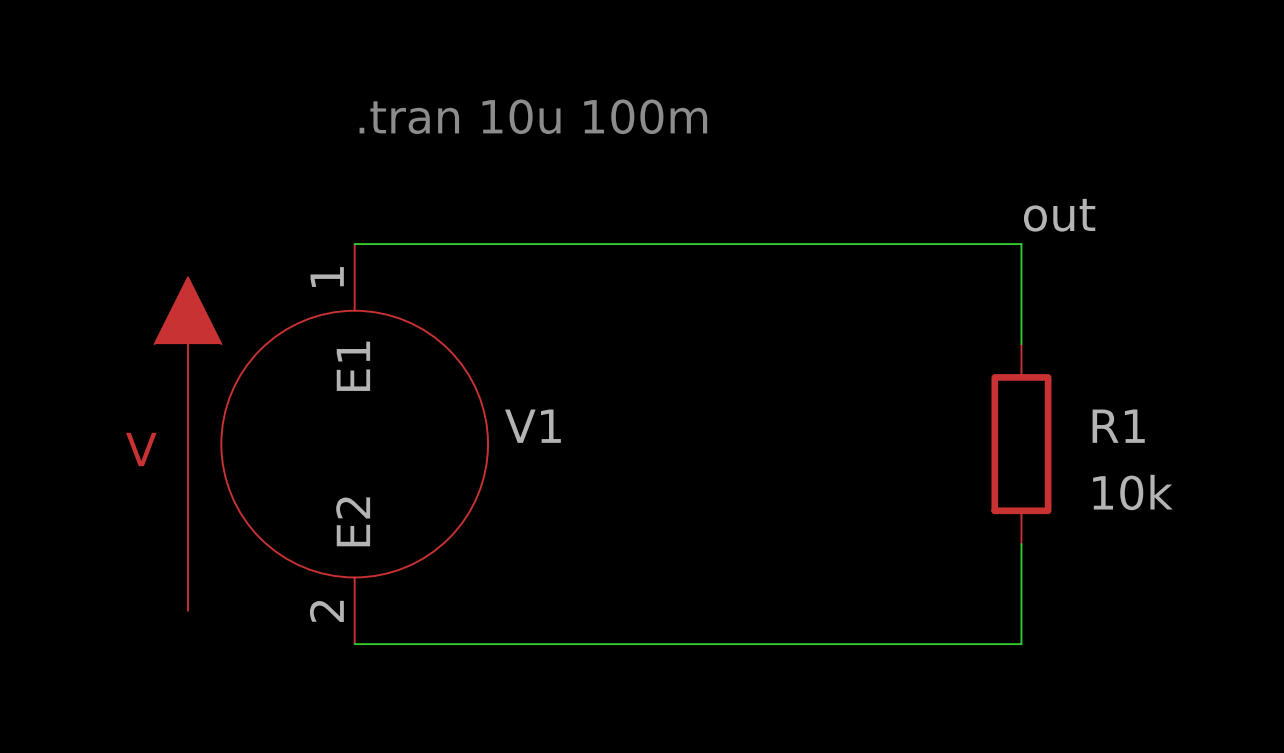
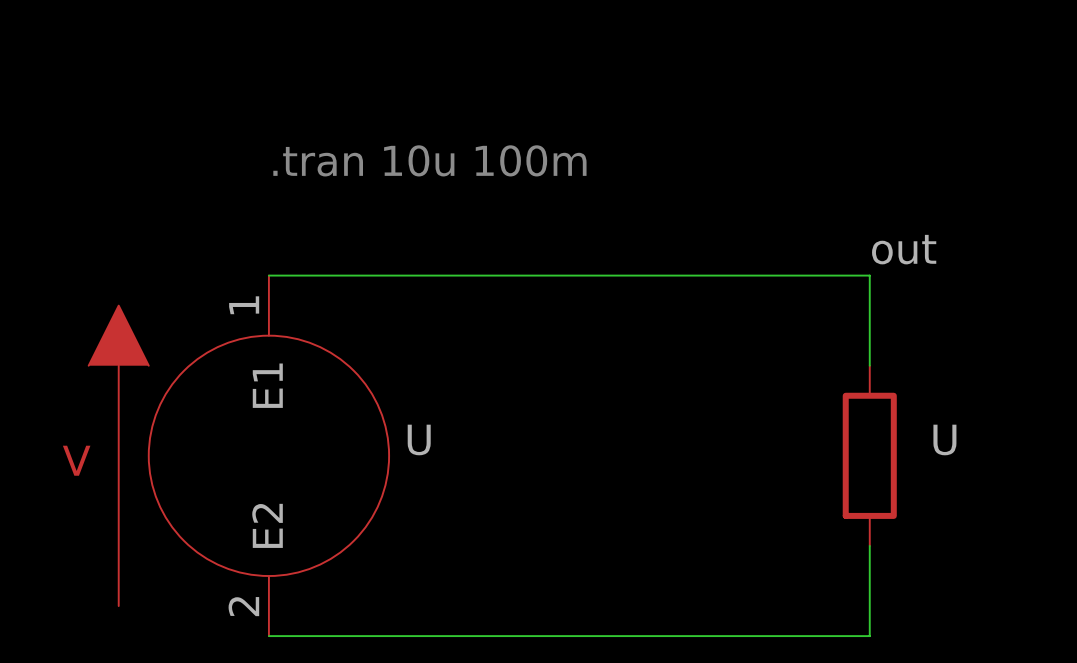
V1 name: V1 (532, 426) -> U (419, 439)
R1 name: R1 (1118, 426) -> U (944, 439)
R1 value: 10k (1132, 492) -> none

